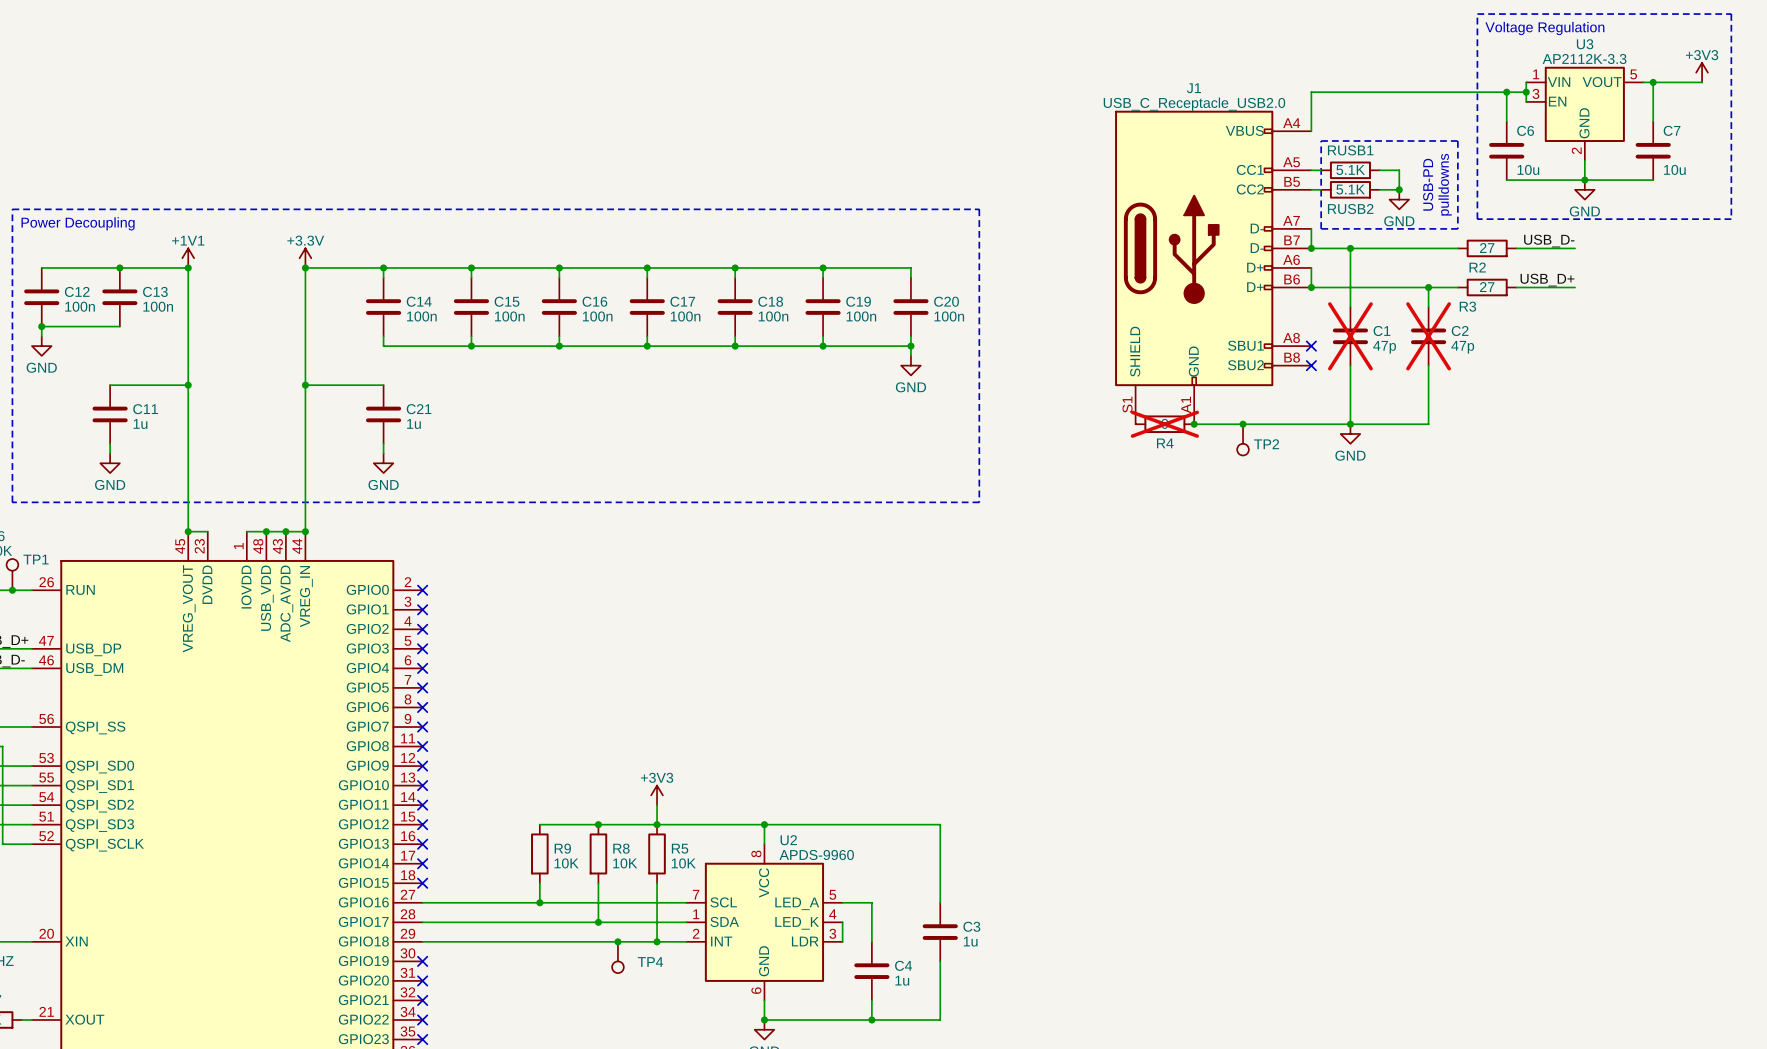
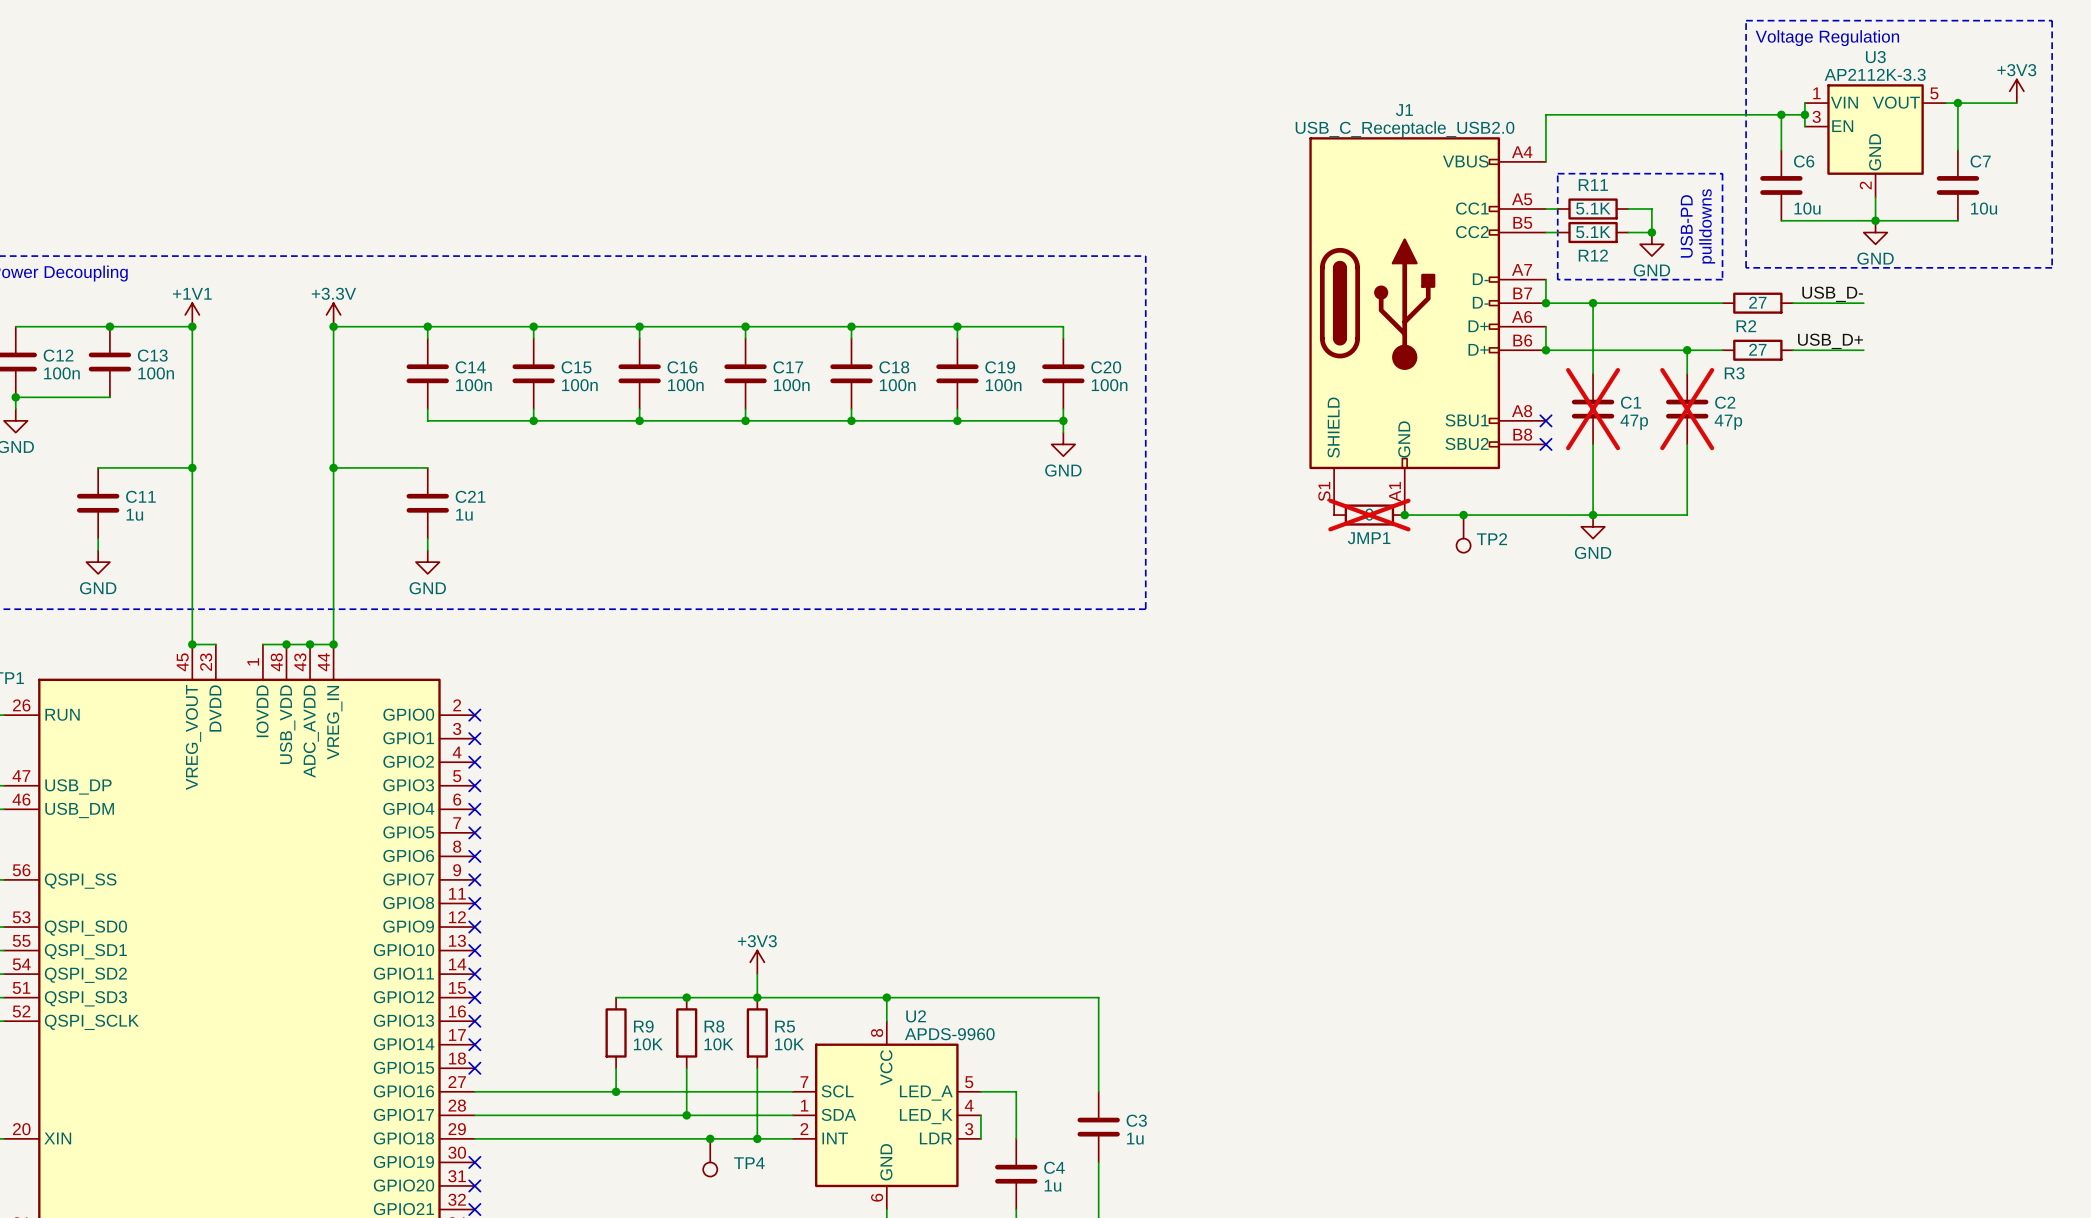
RUSB1 name: RUSB1 (1350, 150) -> R11 (1593, 185)
RUSB2 name: RUSB2 (1350, 209) -> R12 (1593, 255)
R4 name: R4 (1165, 443) -> JMP1 (1369, 538)

